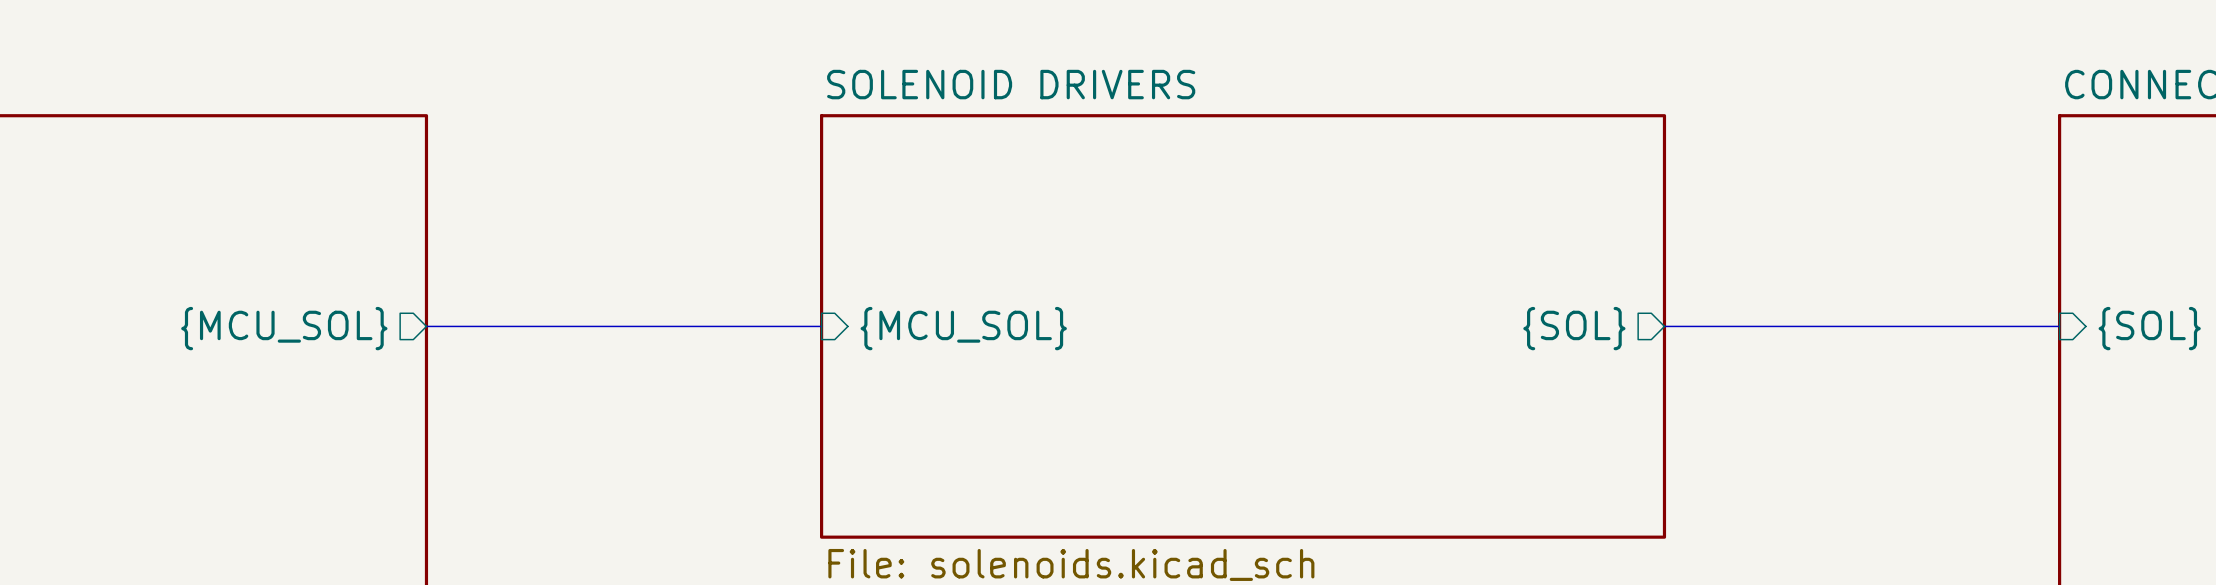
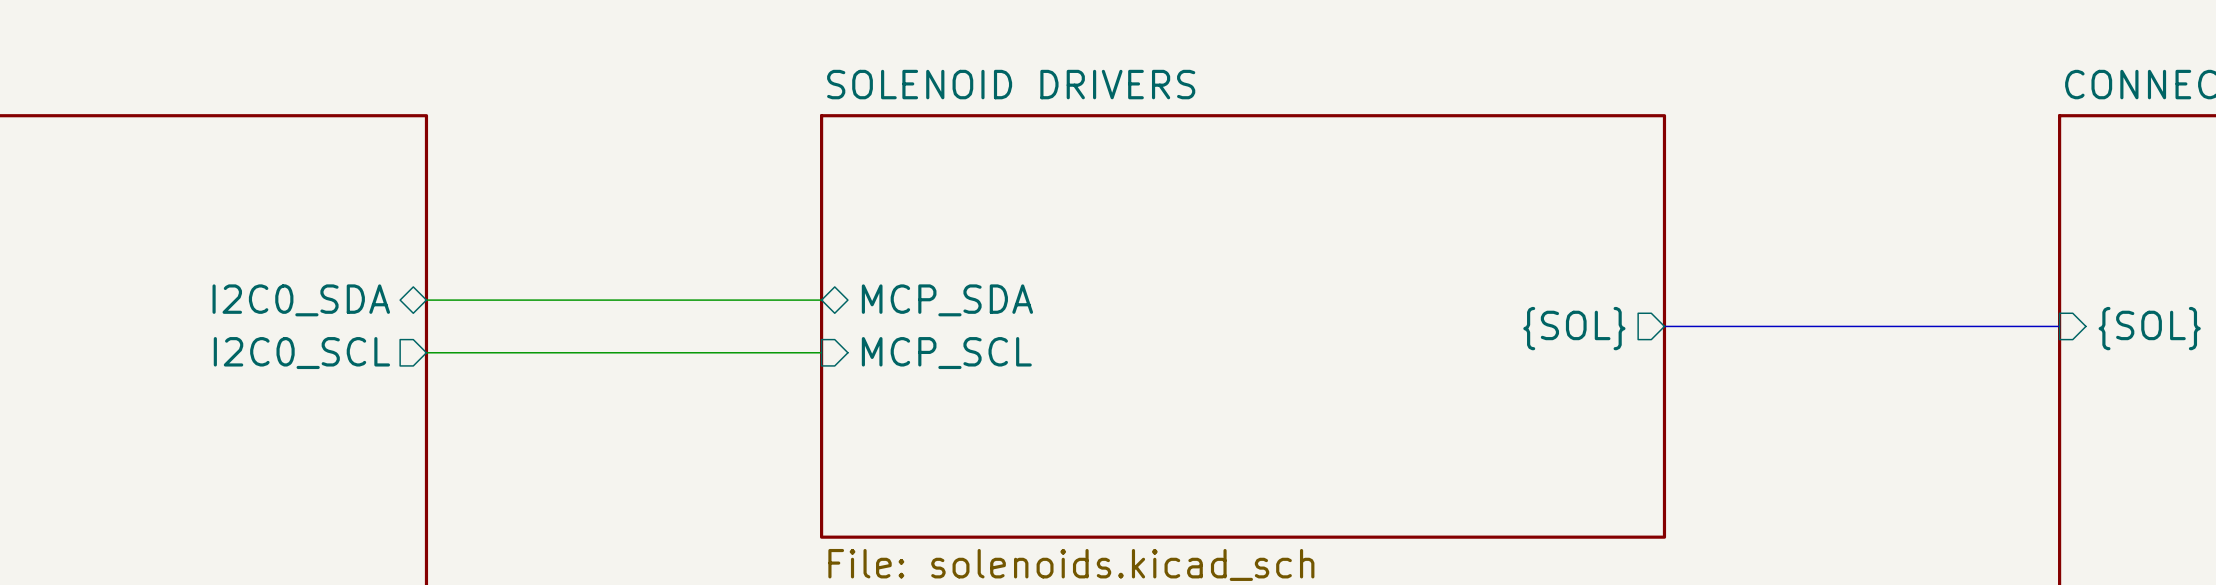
sheet pin: none -> I2C0_SDA (301, 300)
wire: none -> (426, 300) (821, 300)
sheet pin: none -> MCP_SDA (947, 300)
bus: (426, 326) (821, 326) -> none
sheet pin: {MCU_SOL} (284, 328) -> none
sheet pin: {MCU_SOL} (963, 328) -> MCP_SCL (946, 353)
wire: none -> (426, 352) (821, 352)
sheet pin: none -> I2C0_SCL (301, 353)

